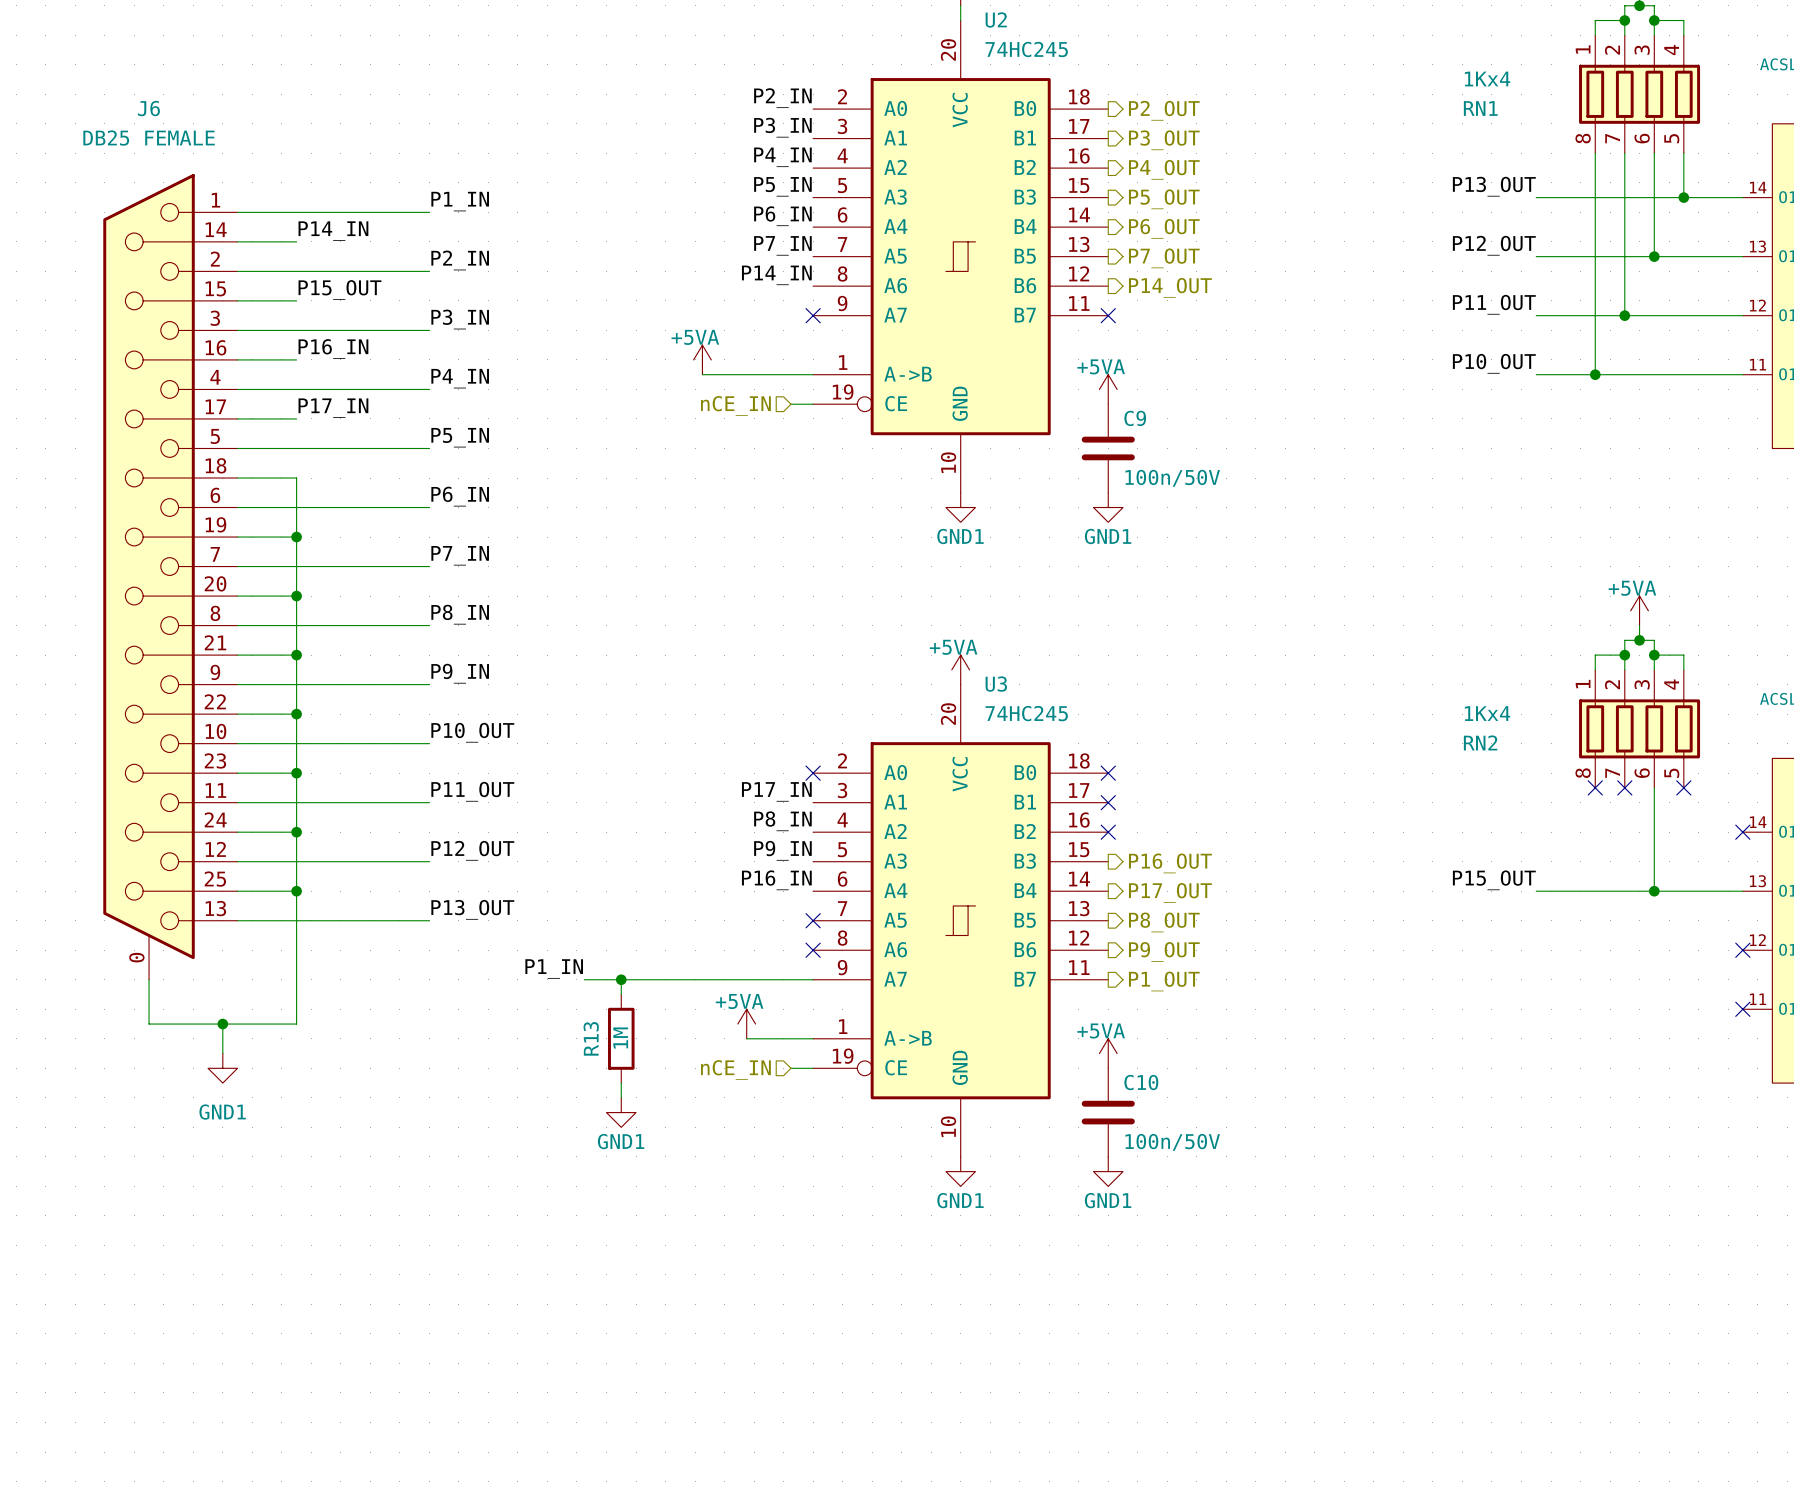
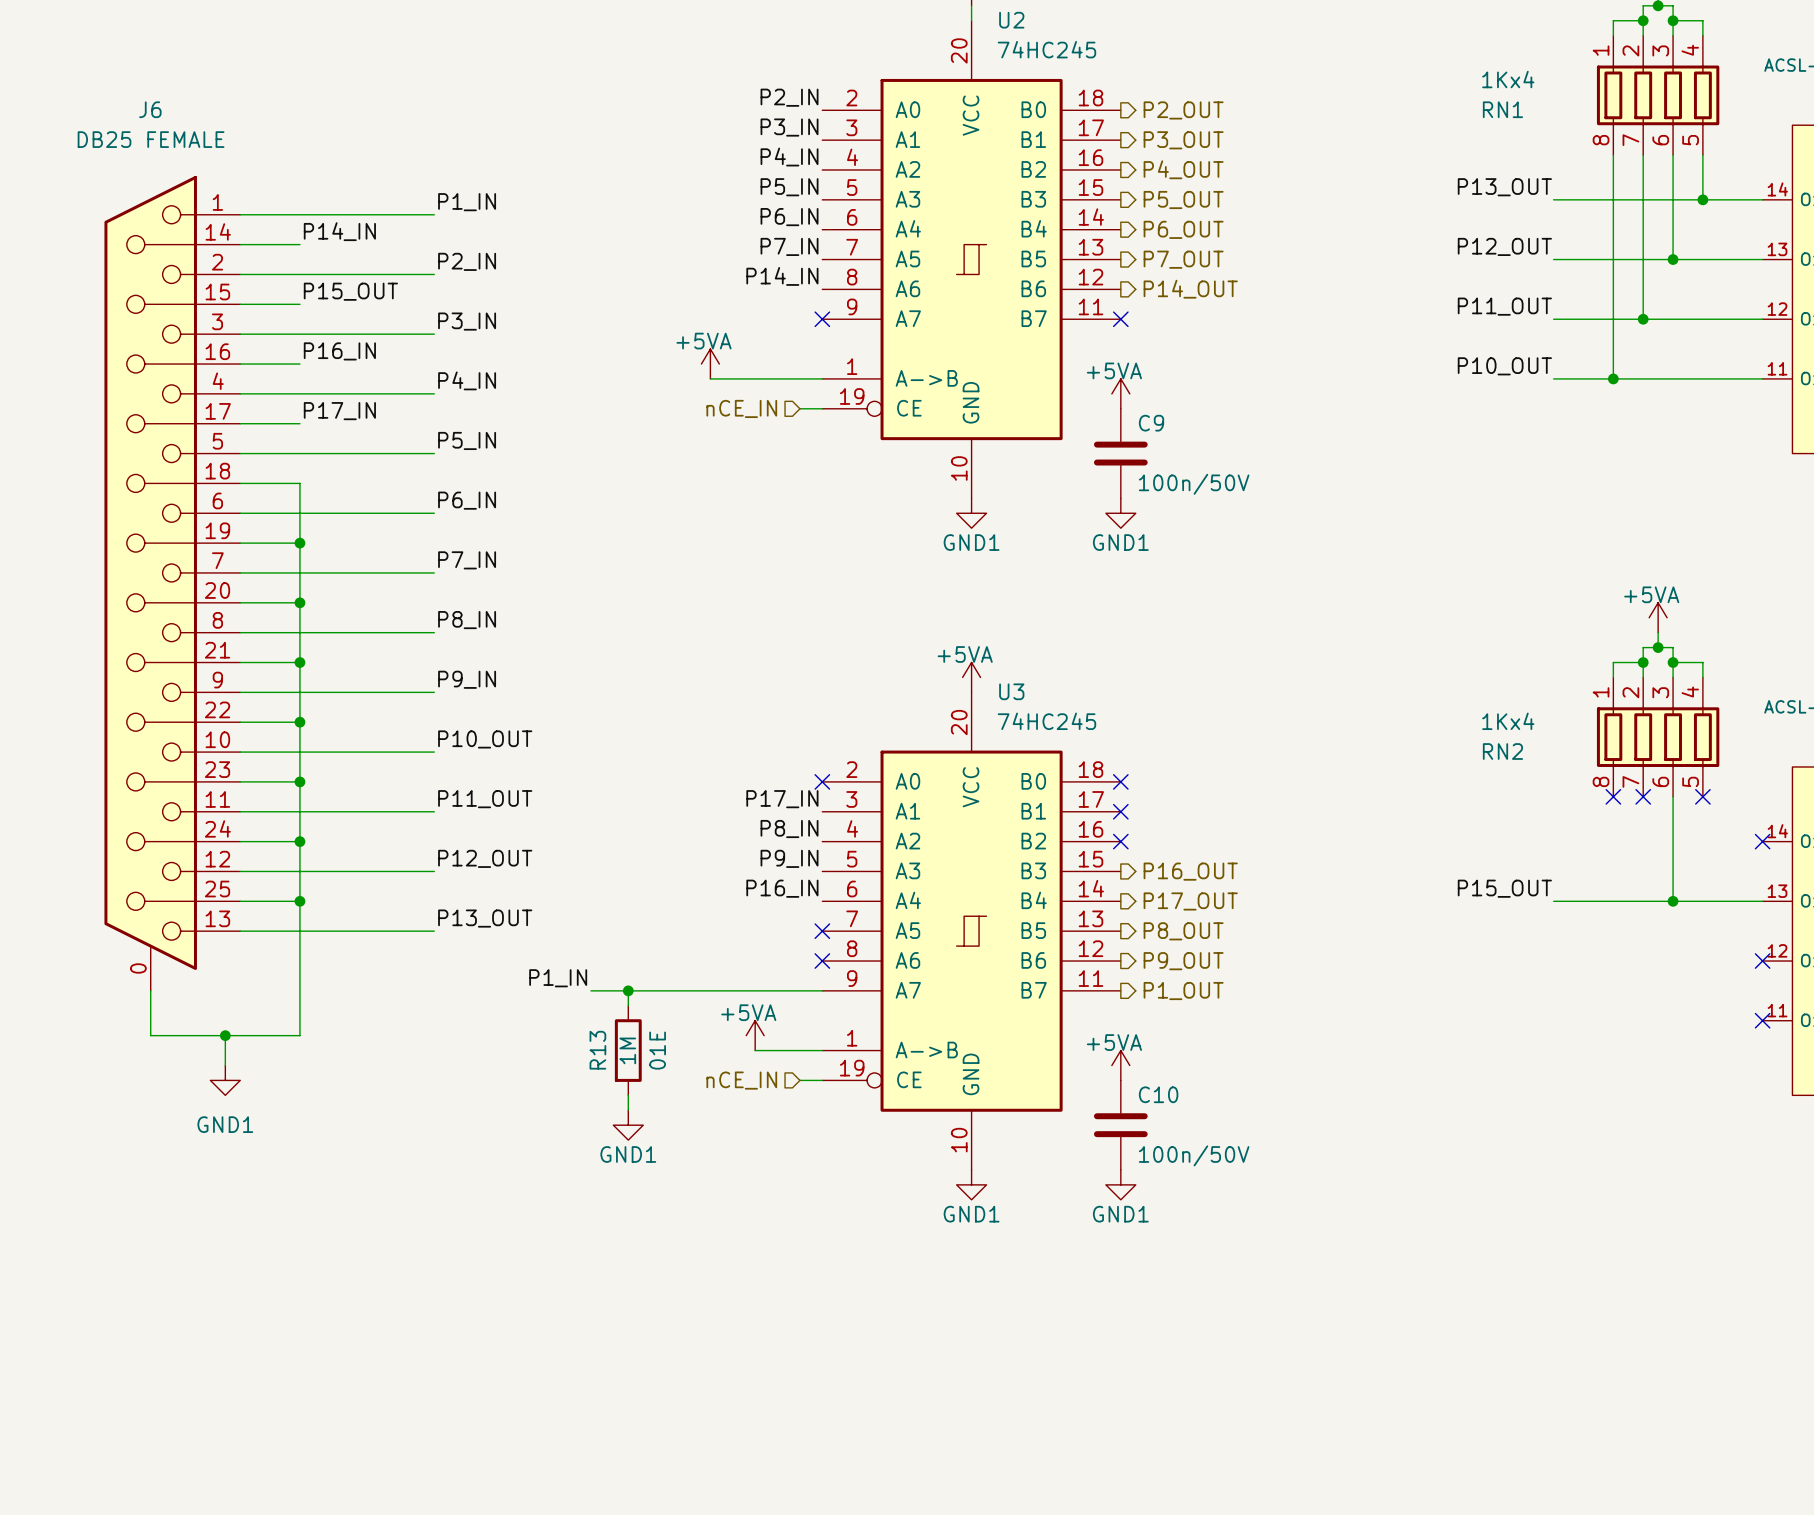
R13 text: none -> 01E (657, 1050)

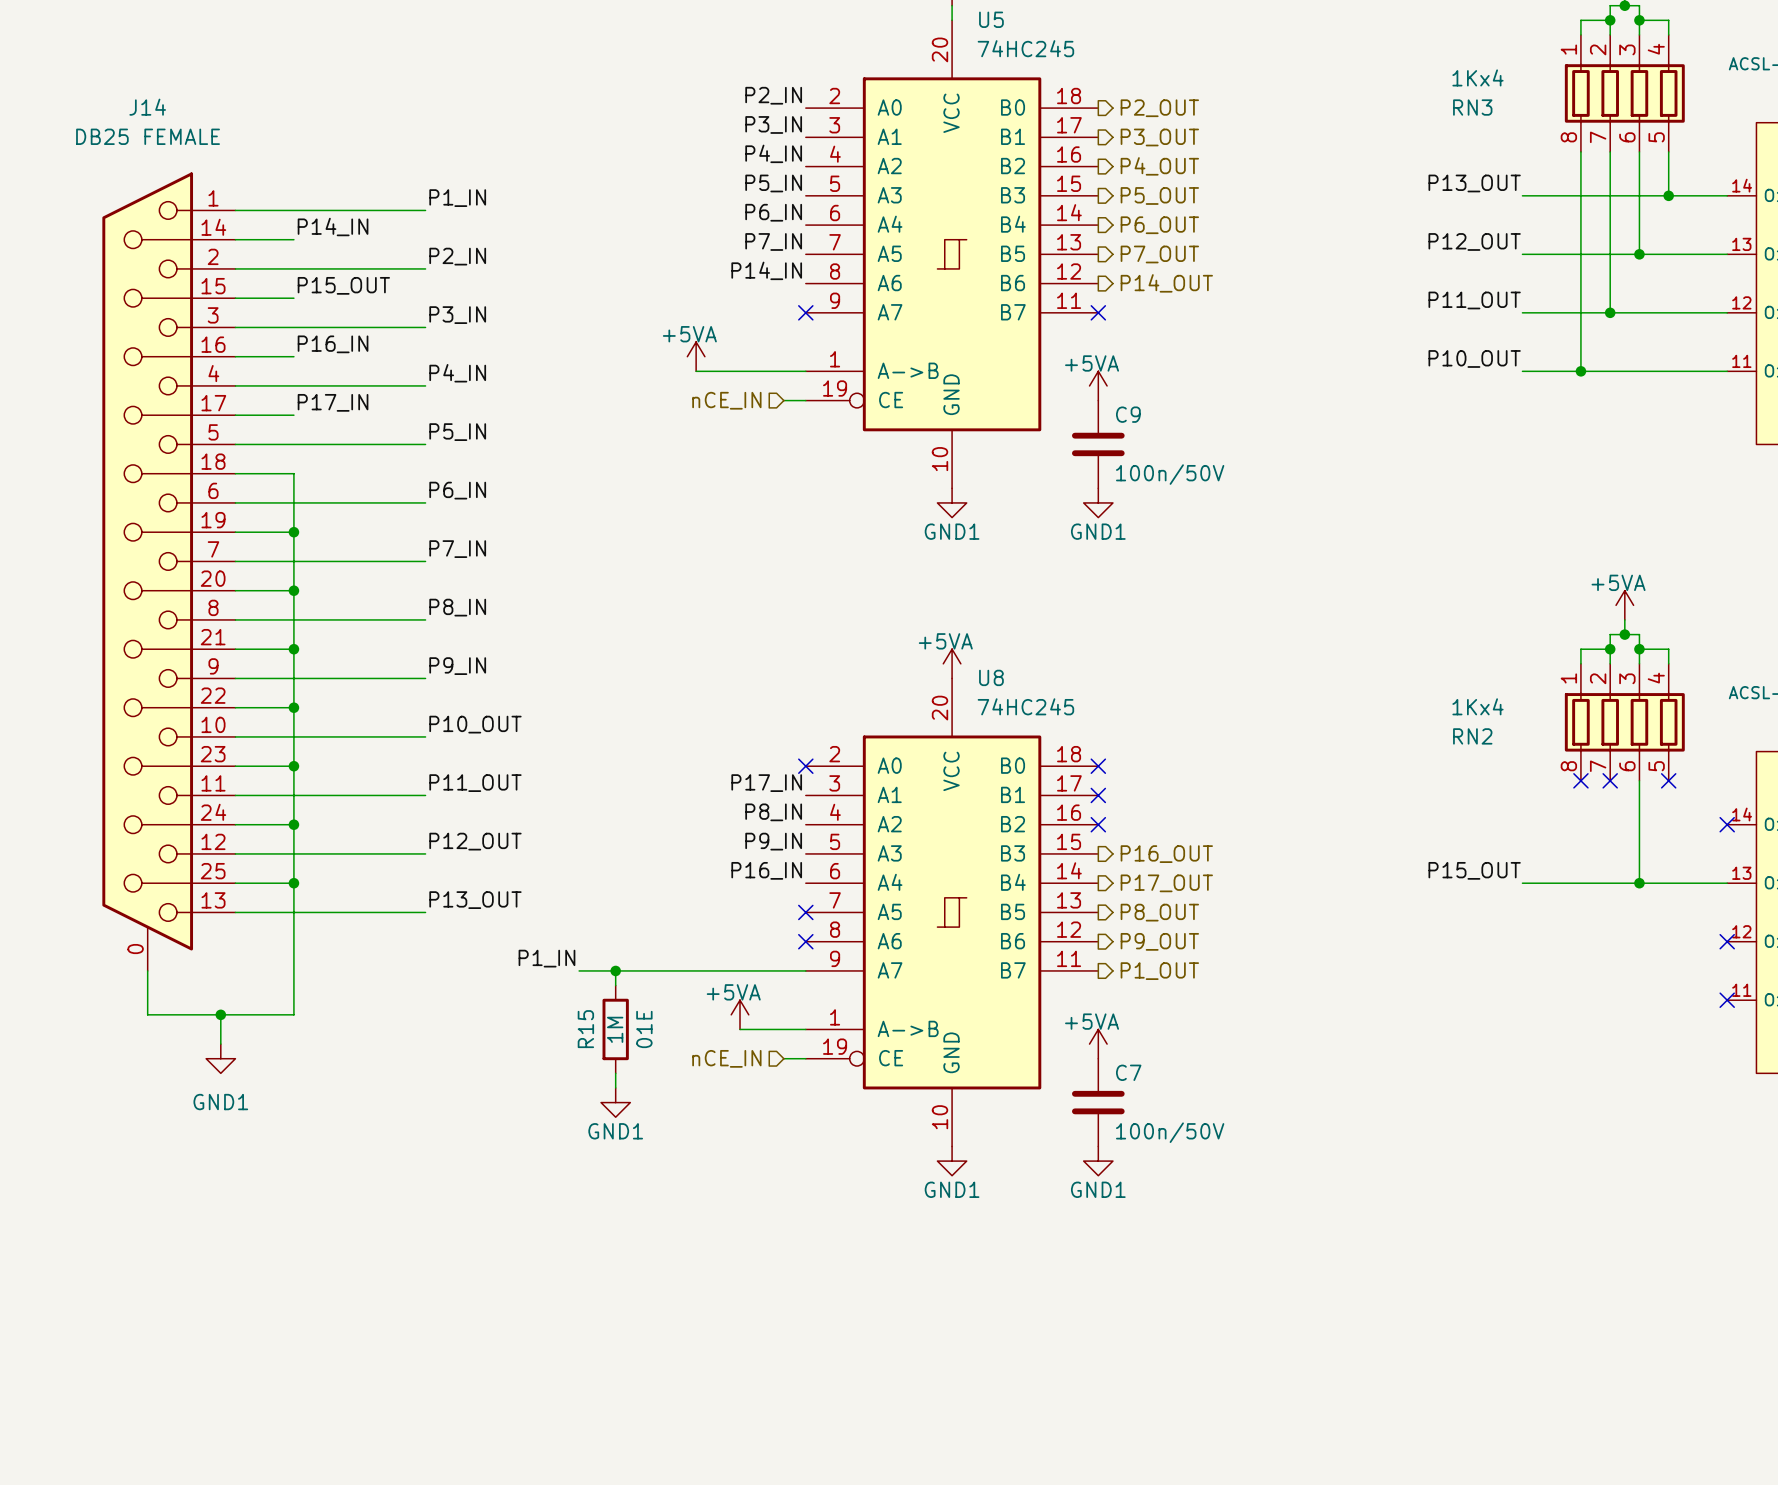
U2 name: U2 (1011, 20) -> U5 (991, 19)
J6 name: J6 (150, 109) -> J14 (147, 107)
RN1 name: RN1 (1502, 109) -> RN3 (1472, 107)
U3 name: U3 (1011, 691) -> U8 (991, 677)
R13 name: R13 (597, 1050) -> R15 (585, 1029)
C10 name: C10 (1158, 1094) -> C7 (1128, 1072)

